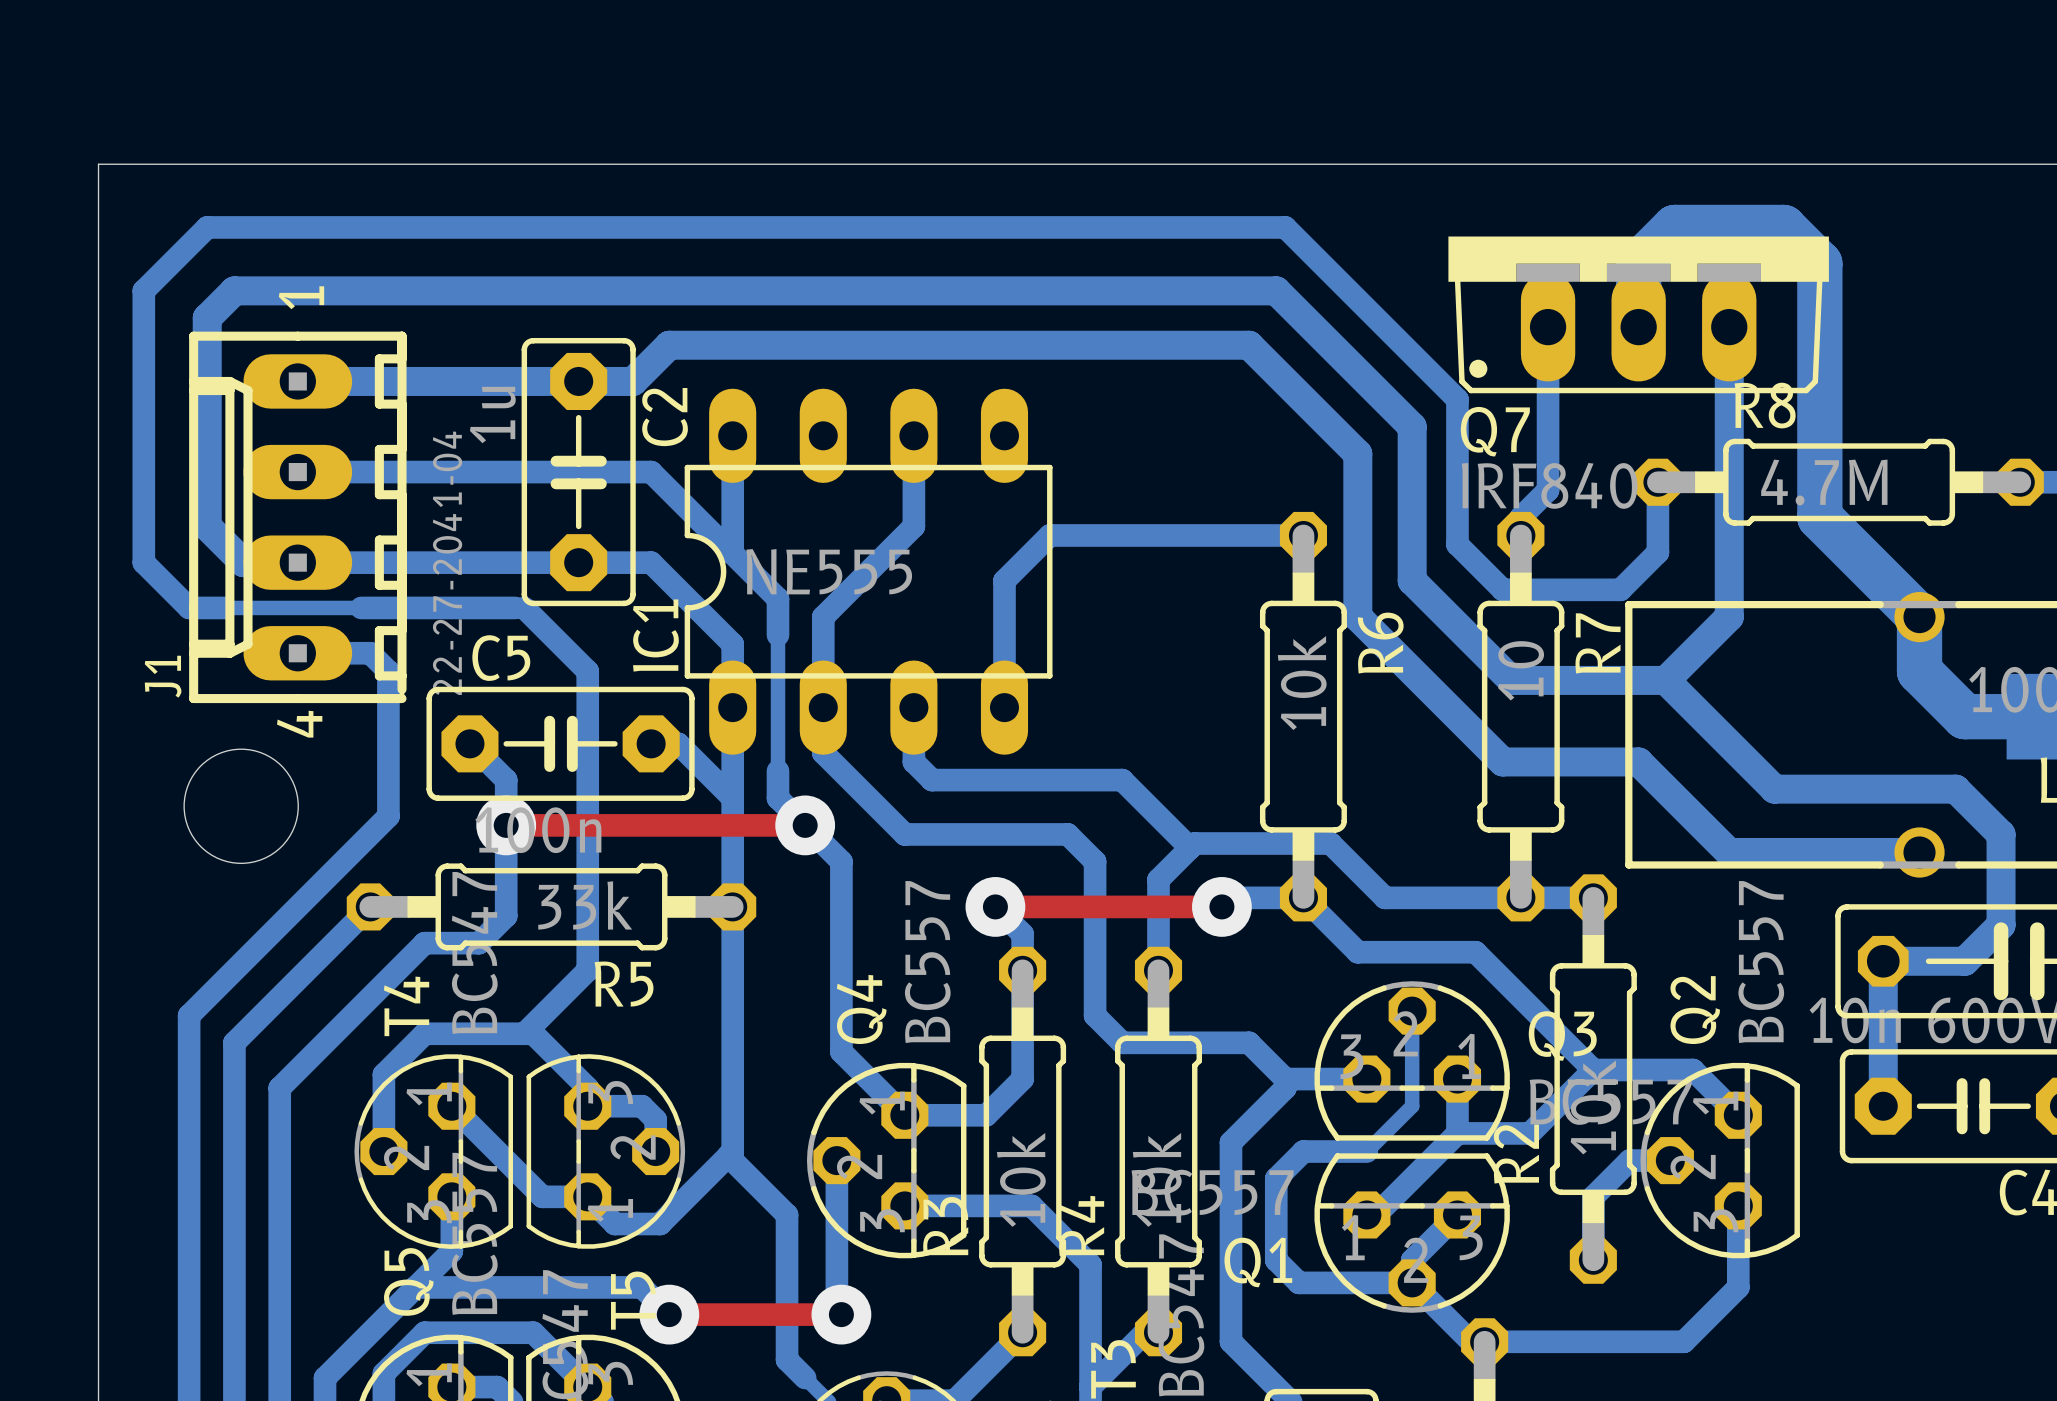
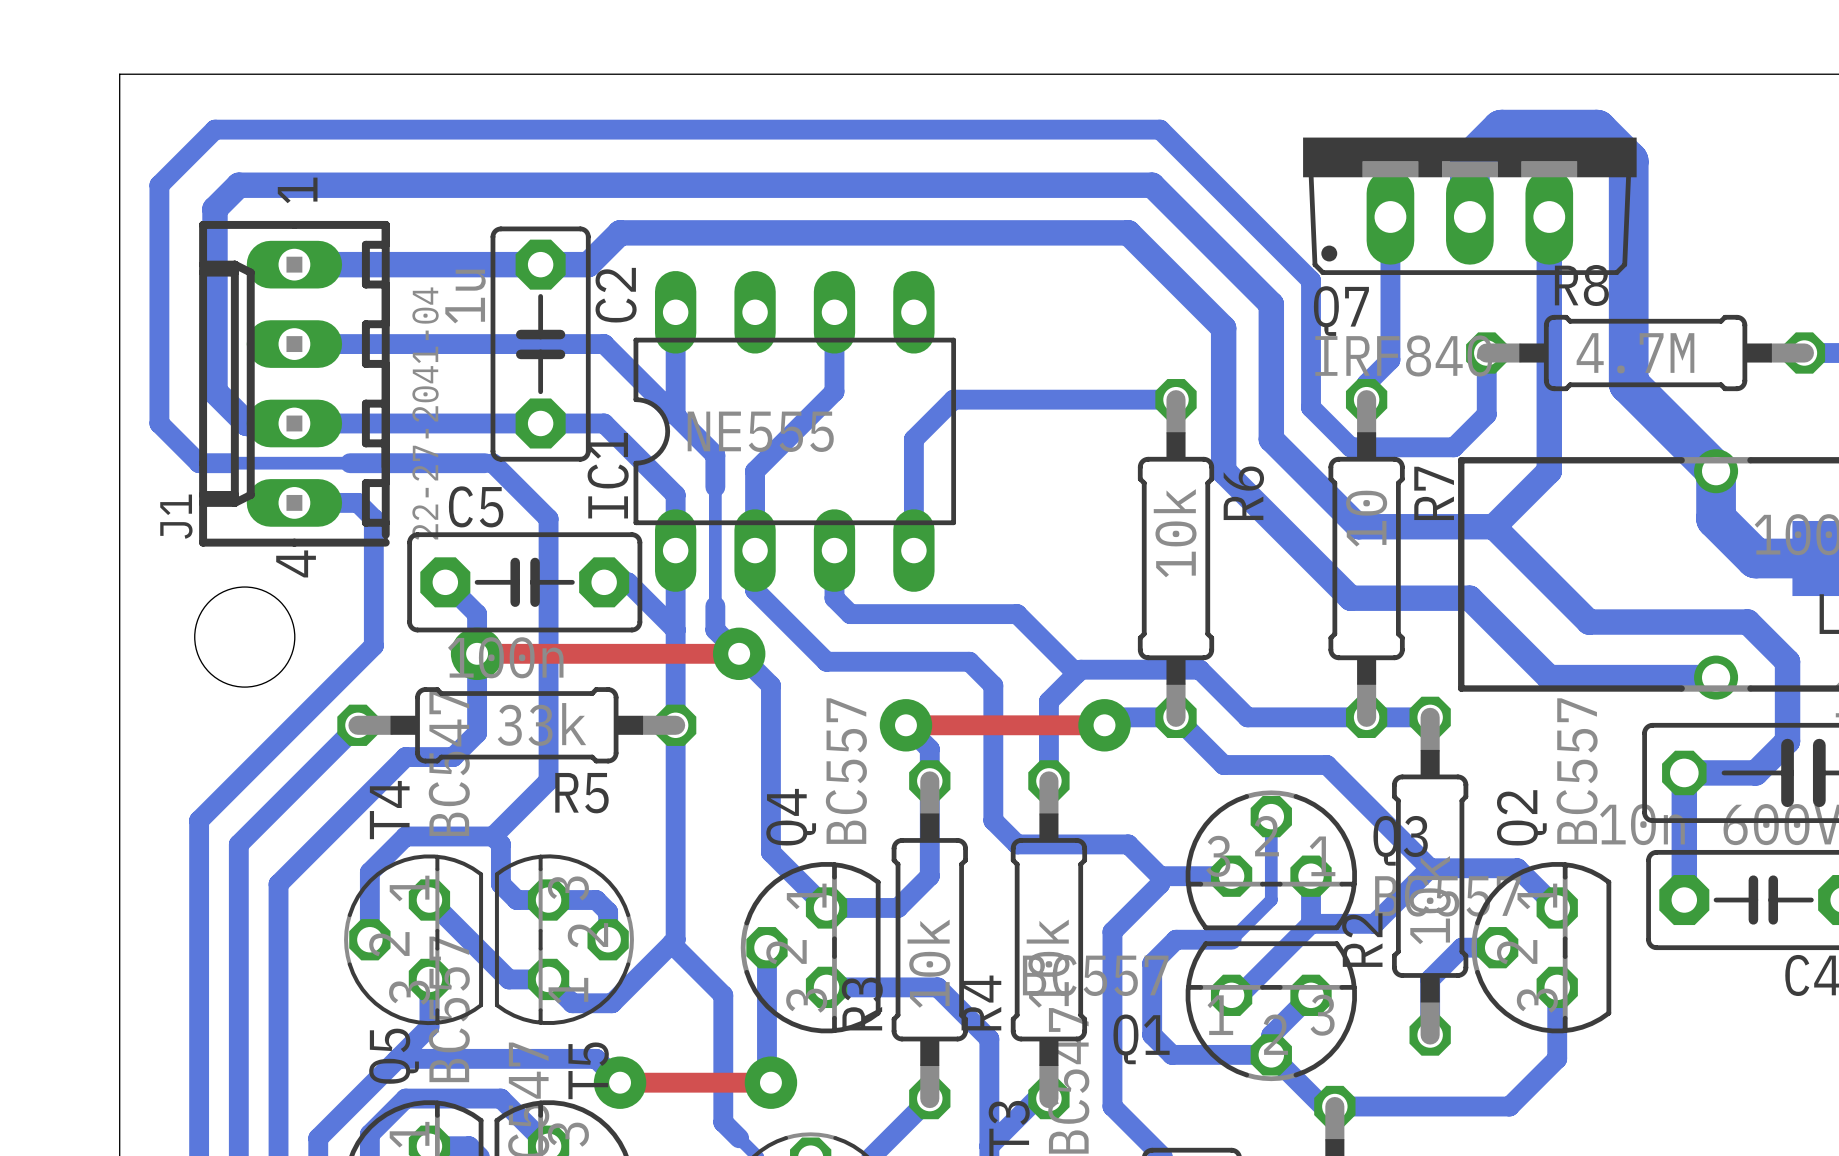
bottom track: (524, 1033) (533, 1033) (587, 1088) (587, 1106) -> (492, 836) (500, 844) (500, 884) (516, 900) (548, 900)

